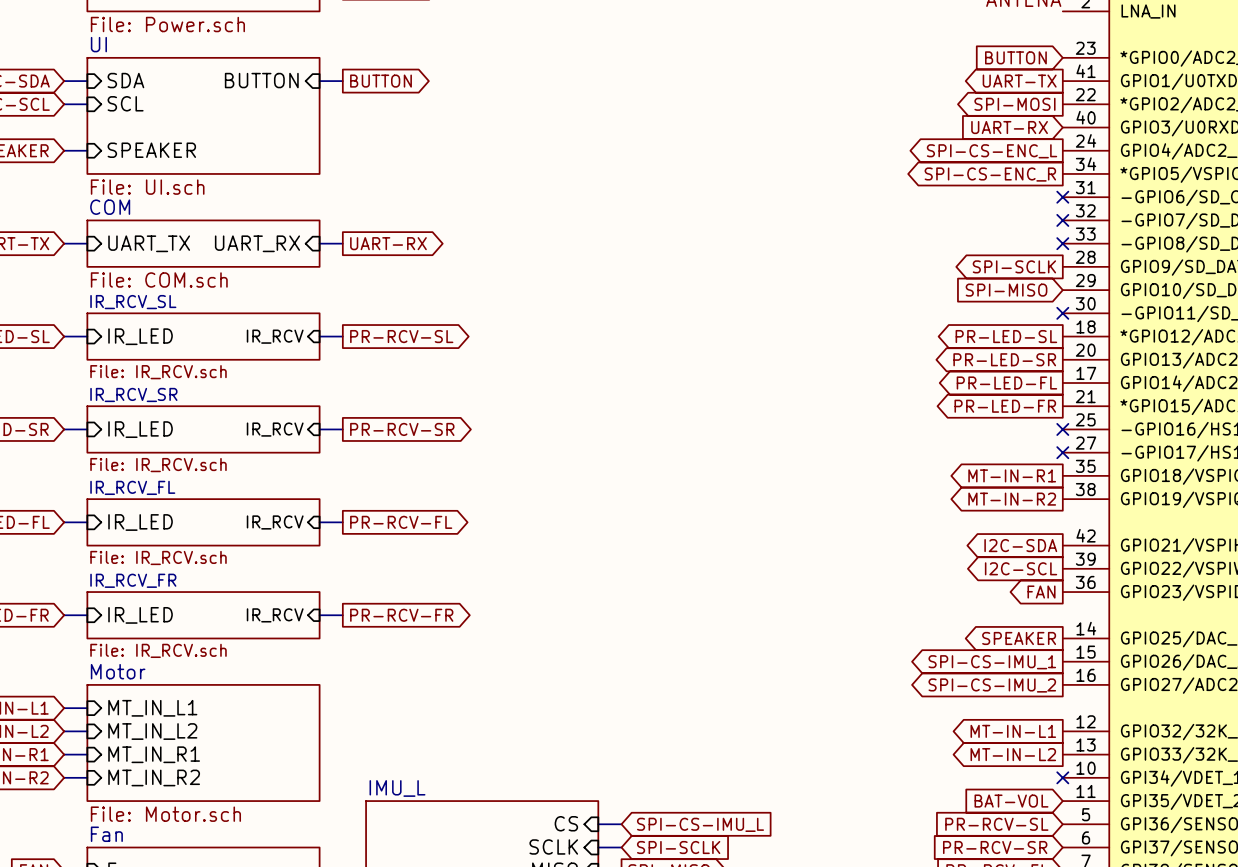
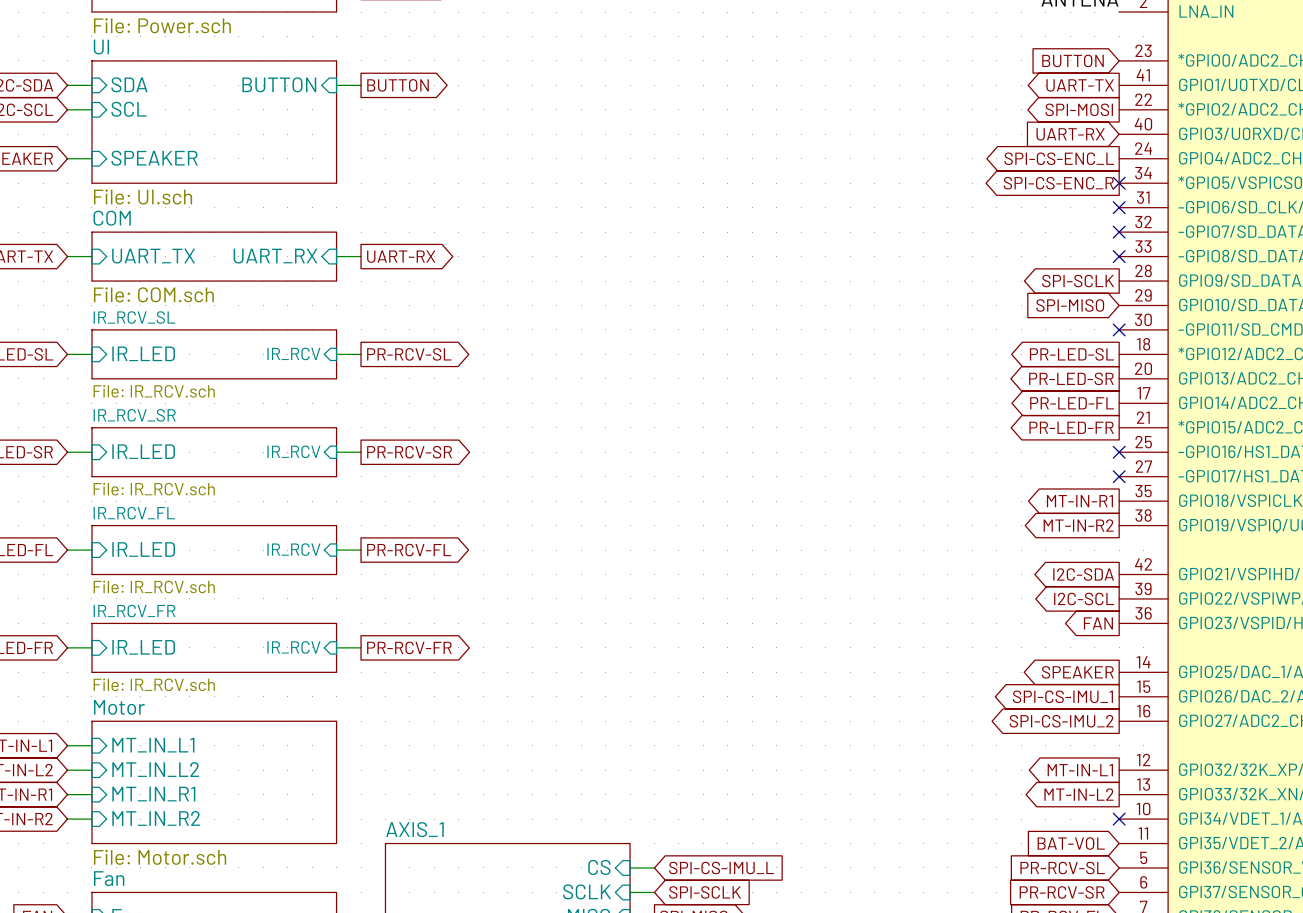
no-connect mark: none -> (1119, 183)
sheet IMU_L name: IMU_L (397, 788) -> AXIS_1 (414, 829)

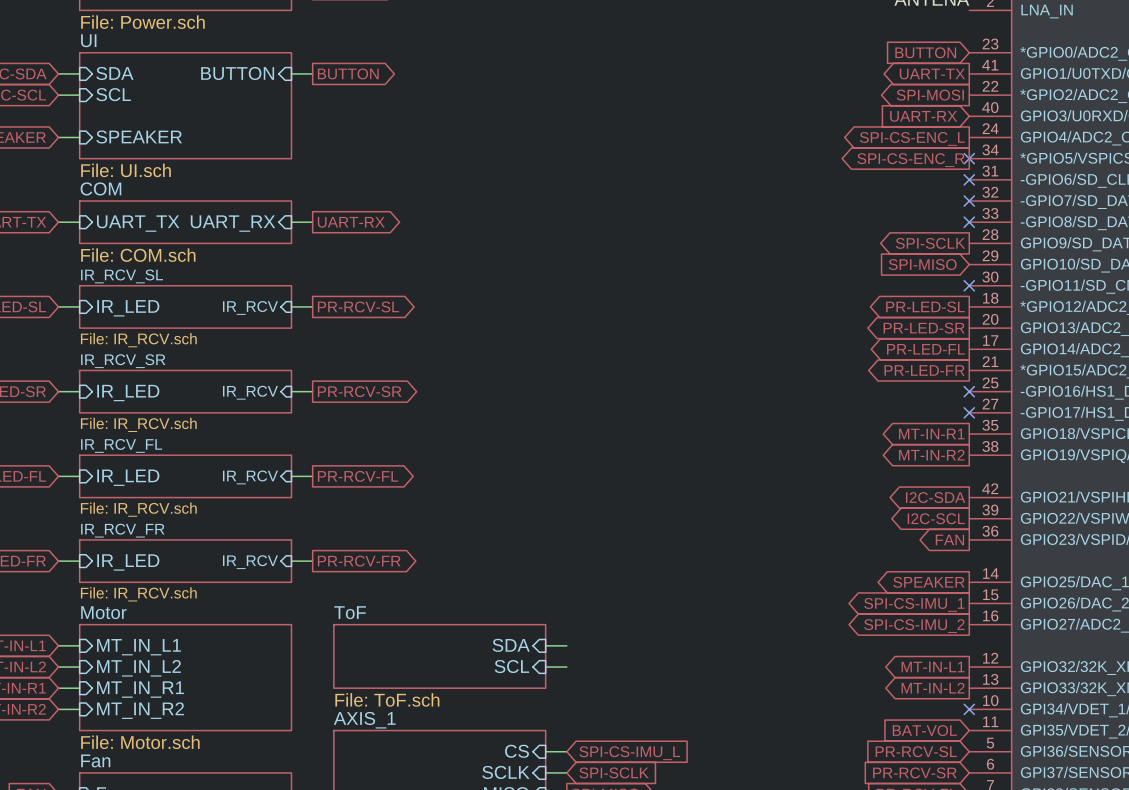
sheet pin: none -> SDA (511, 645)
wire: none -> (545, 645) (566, 645)
sheet ToF: none -> File: ToF.sch (439, 656)
sheet pin: none -> SCL (511, 666)
wire: none -> (545, 667) (566, 667)

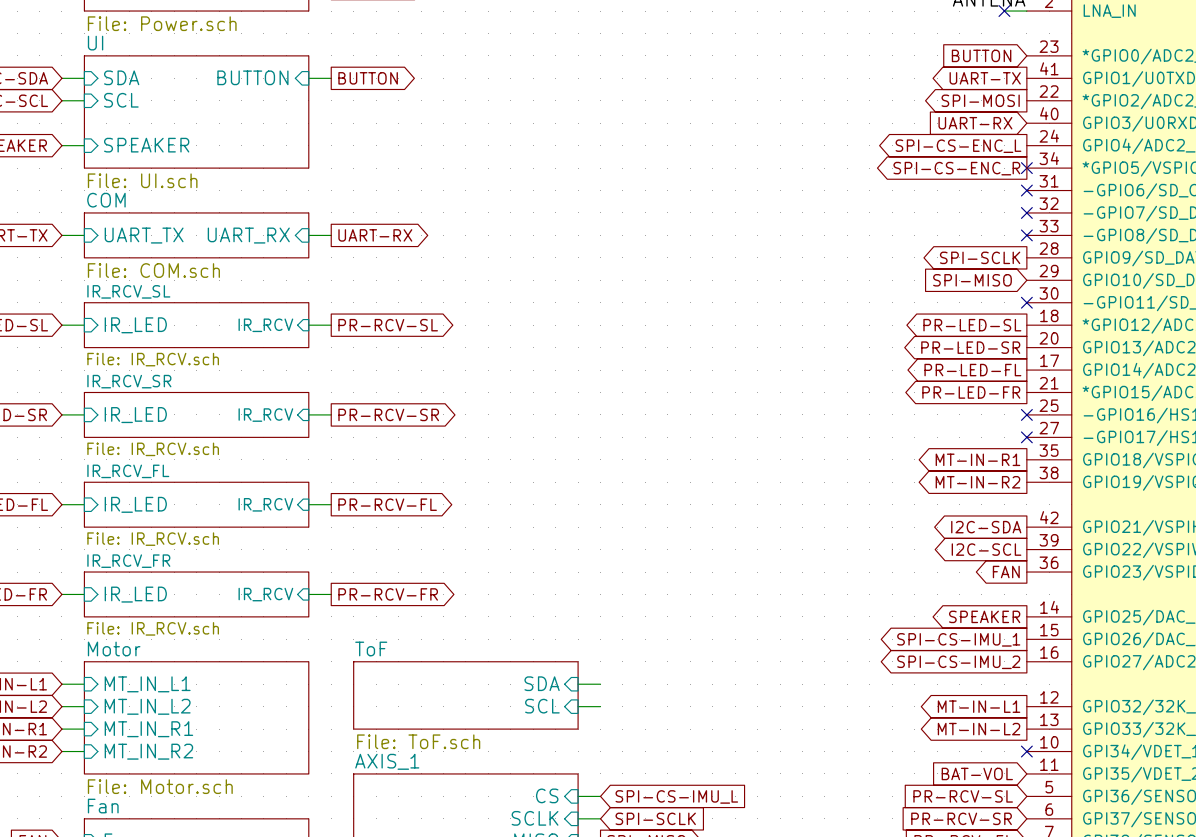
wire: none -> (1004, 11) (1026, 11)
no-connect mark: none -> (1004, 11)

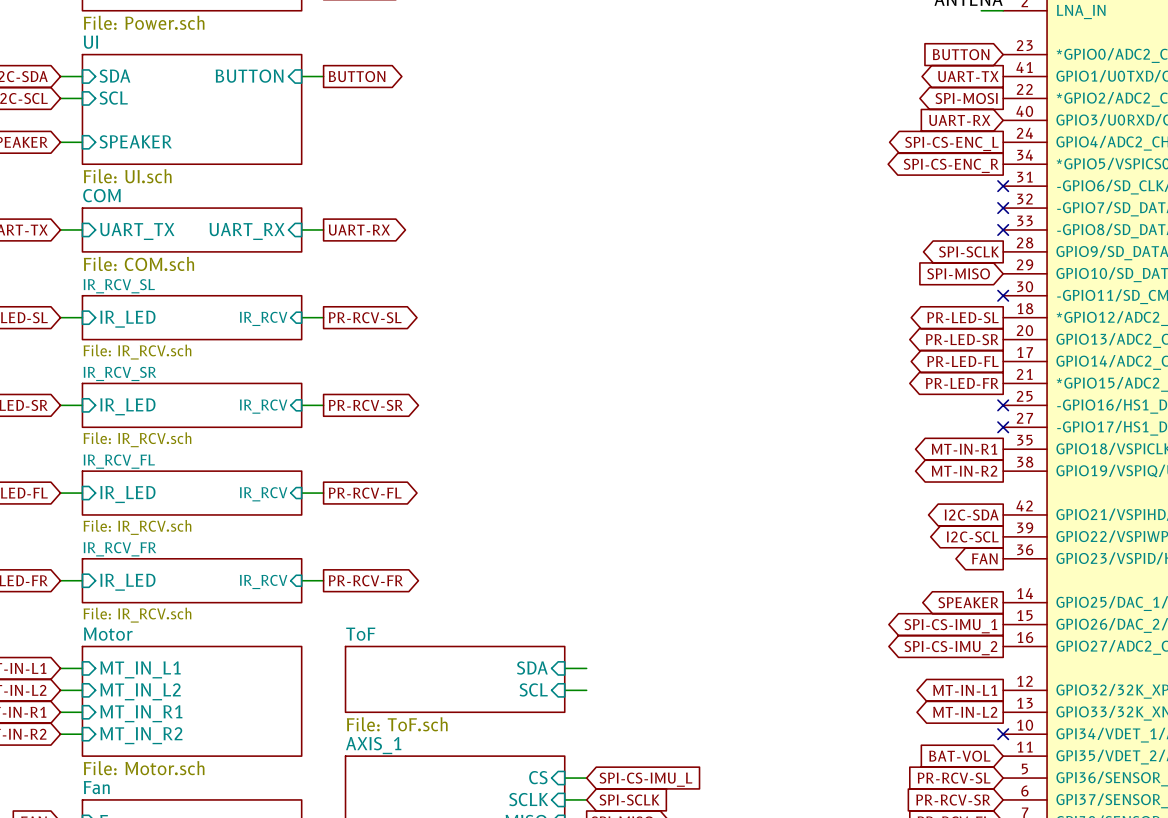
no-connect mark: (1004, 11) -> none
no-connect mark: (1026, 168) -> none

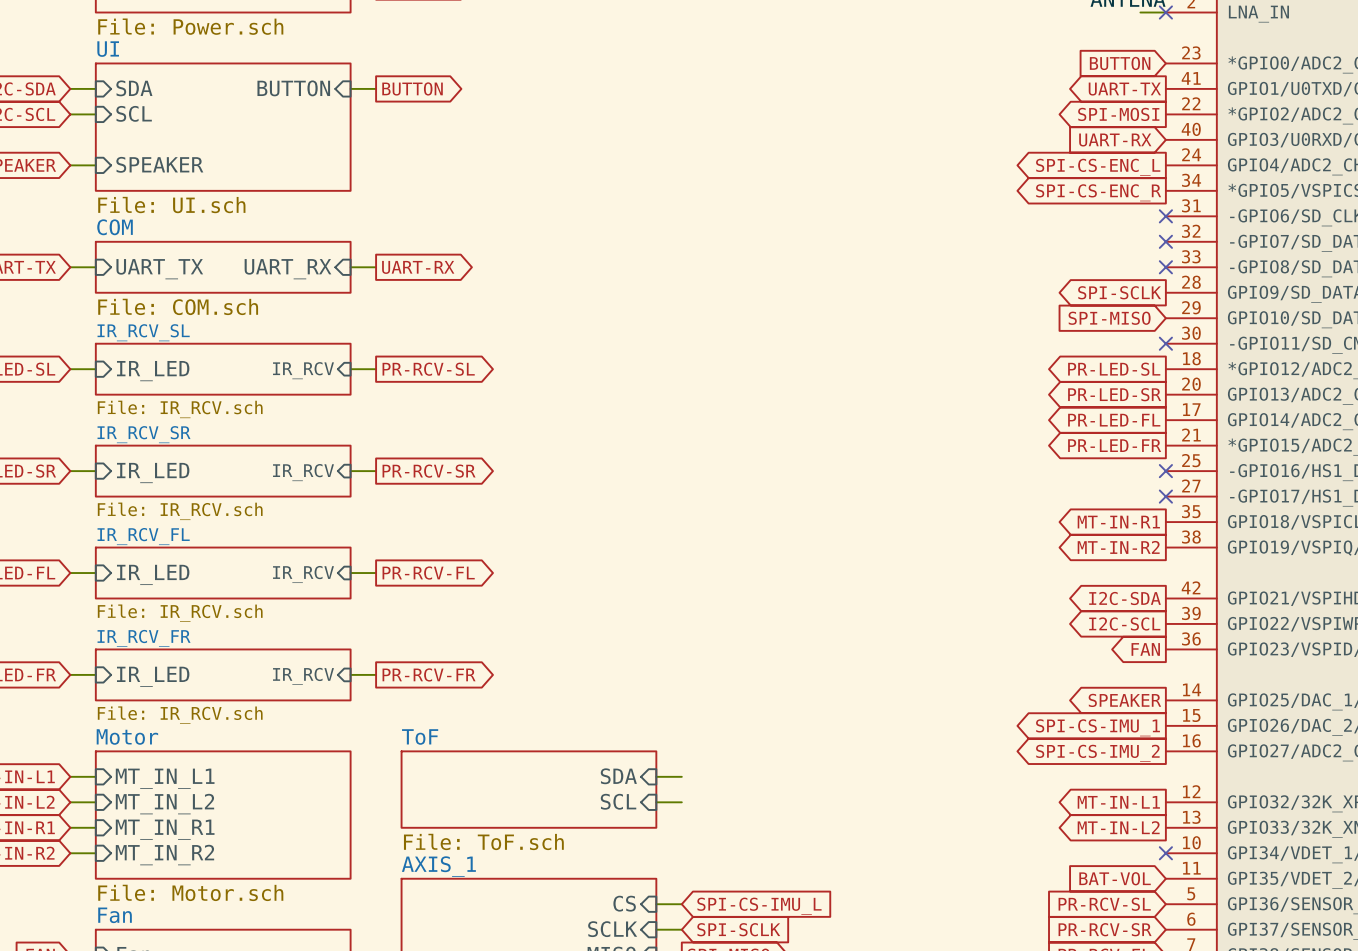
no-connect mark: none -> (1165, 12)

